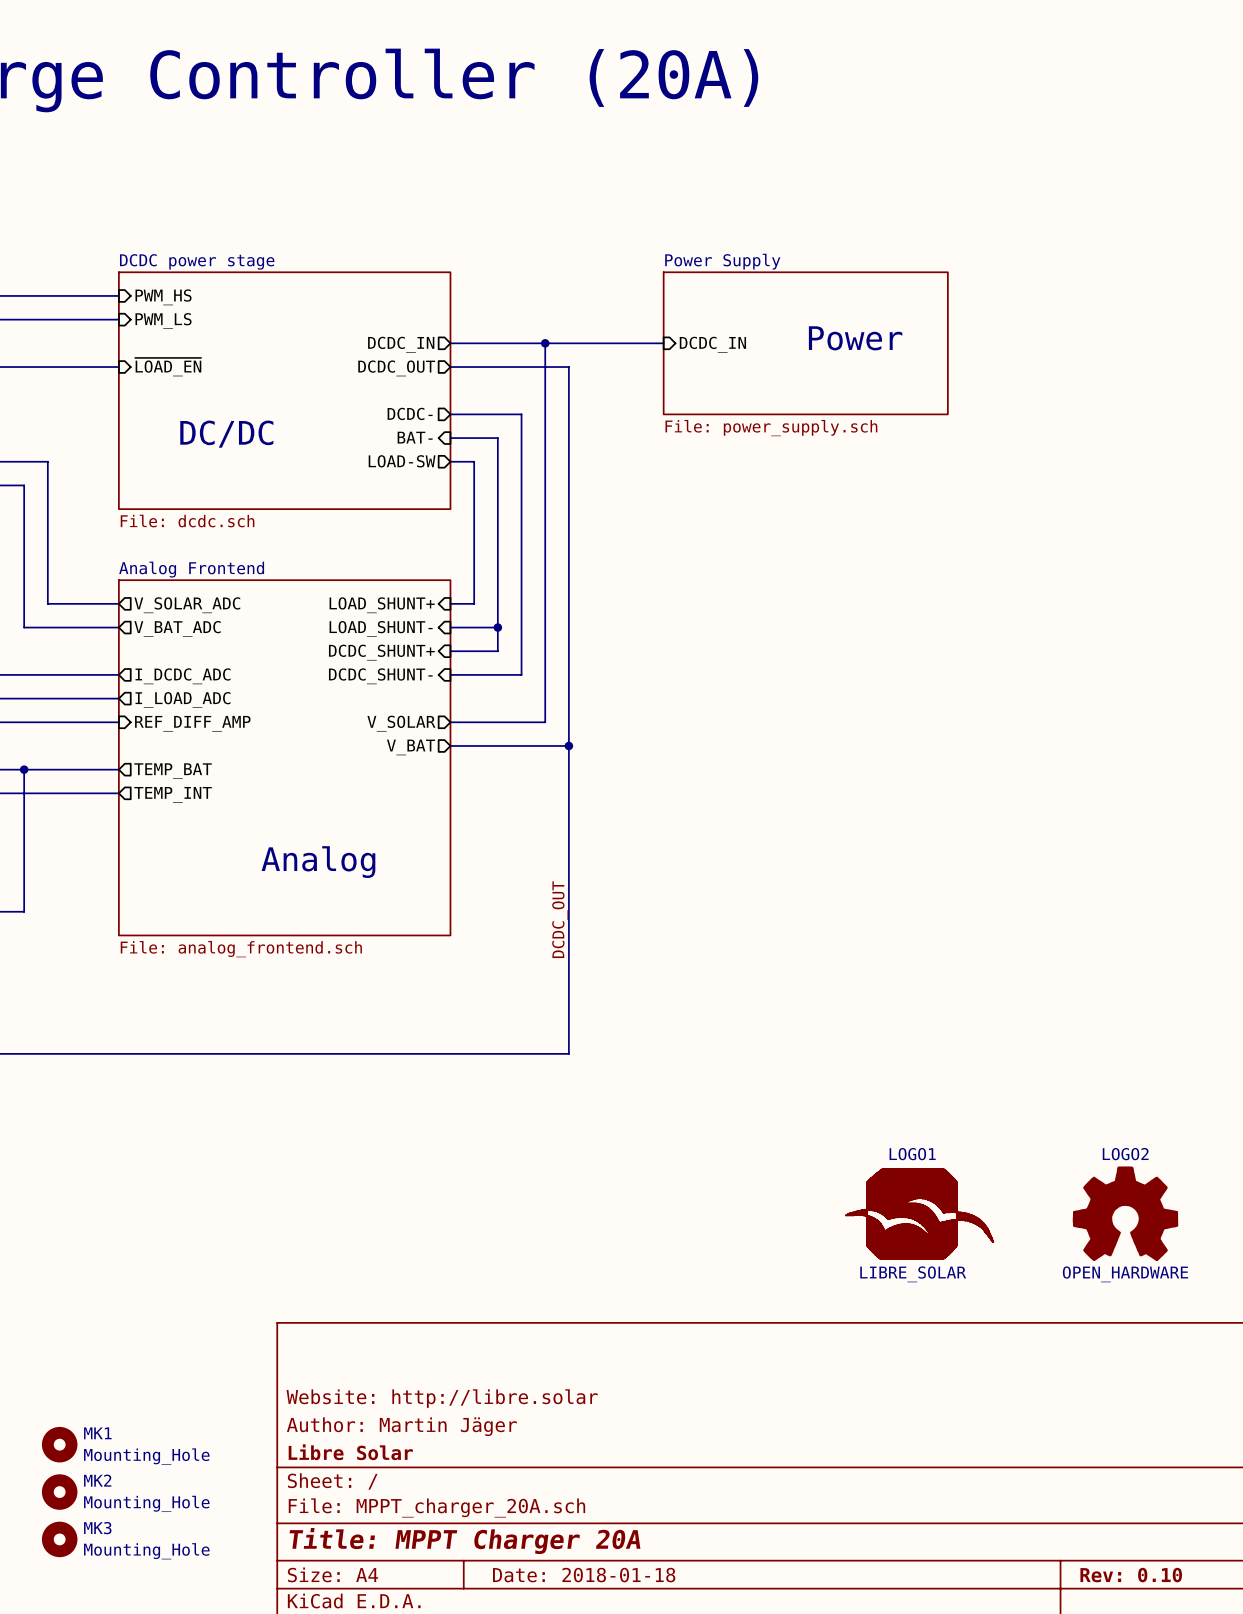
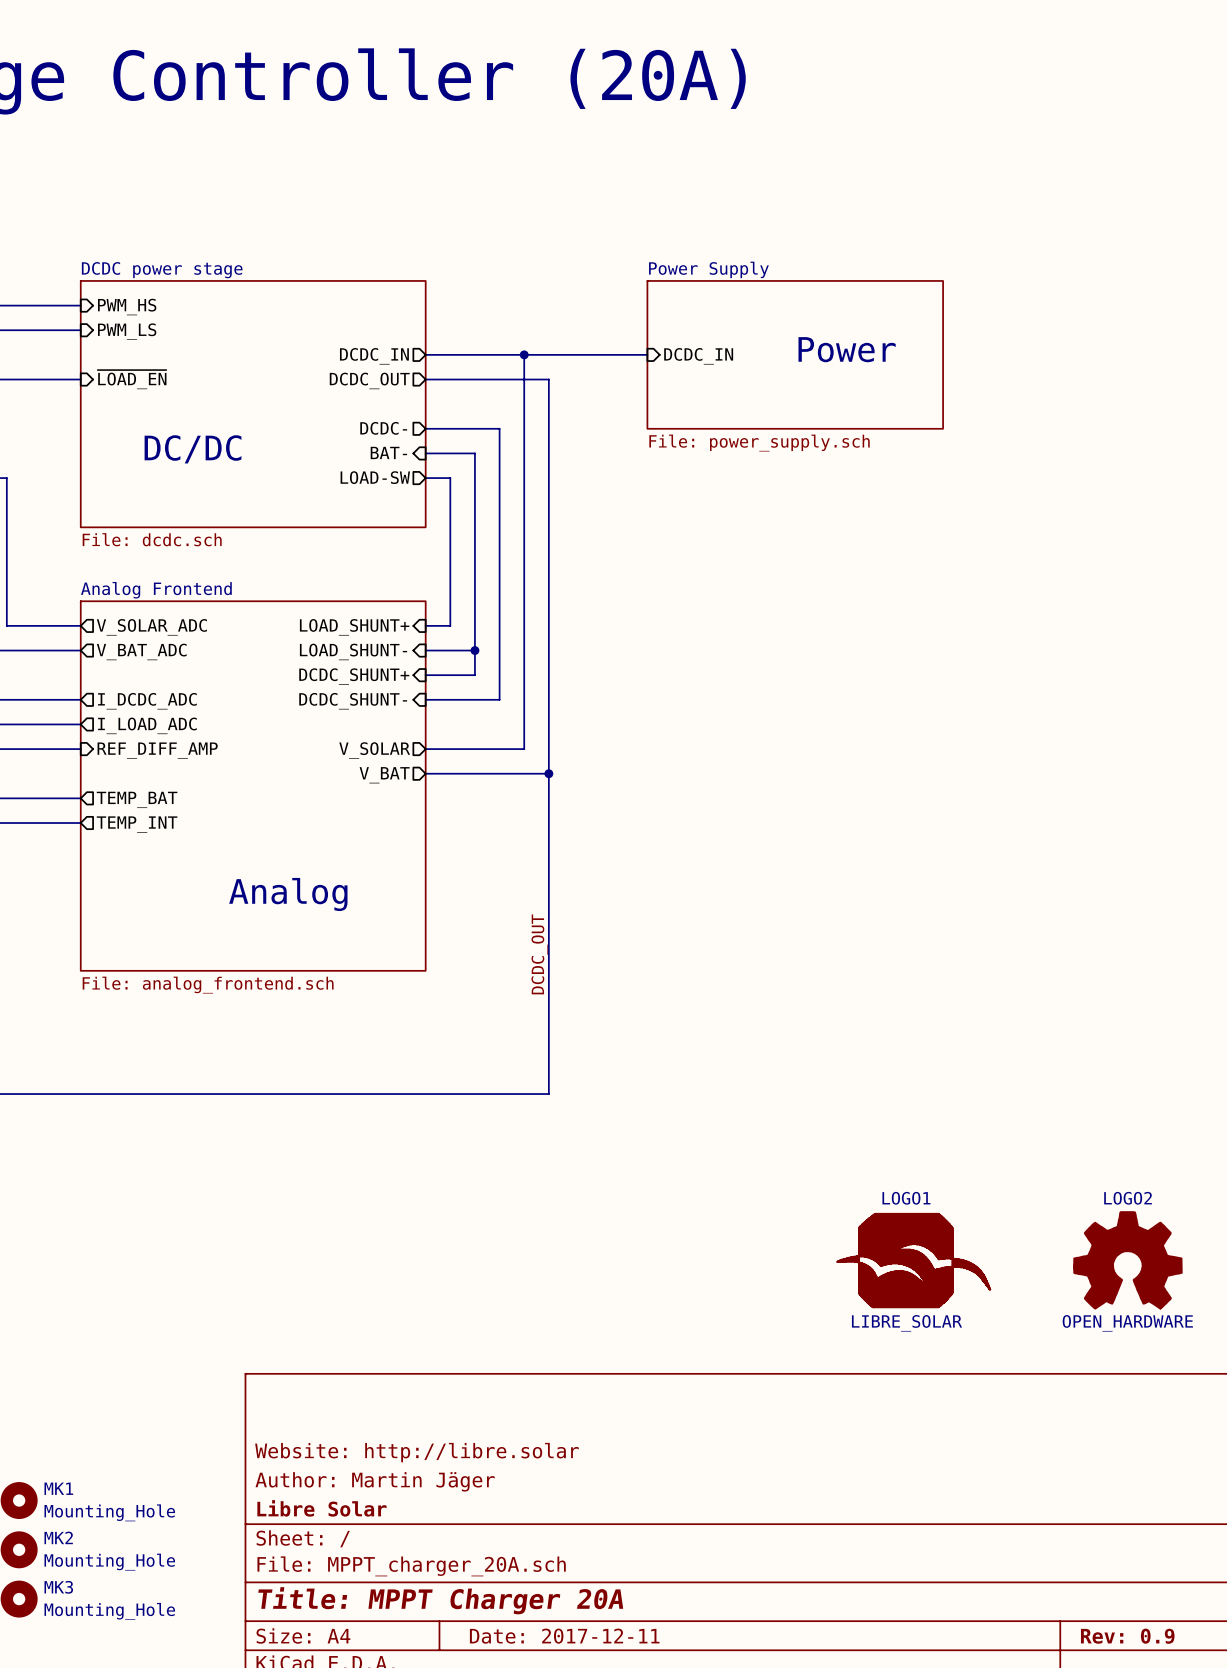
title block: Date: 2018-01-18 (584, 1575) -> Date: 2017-12-11 (564, 1636)
title block: Rev: 0.10 (1131, 1575) -> Rev: 0.9 (1127, 1636)

